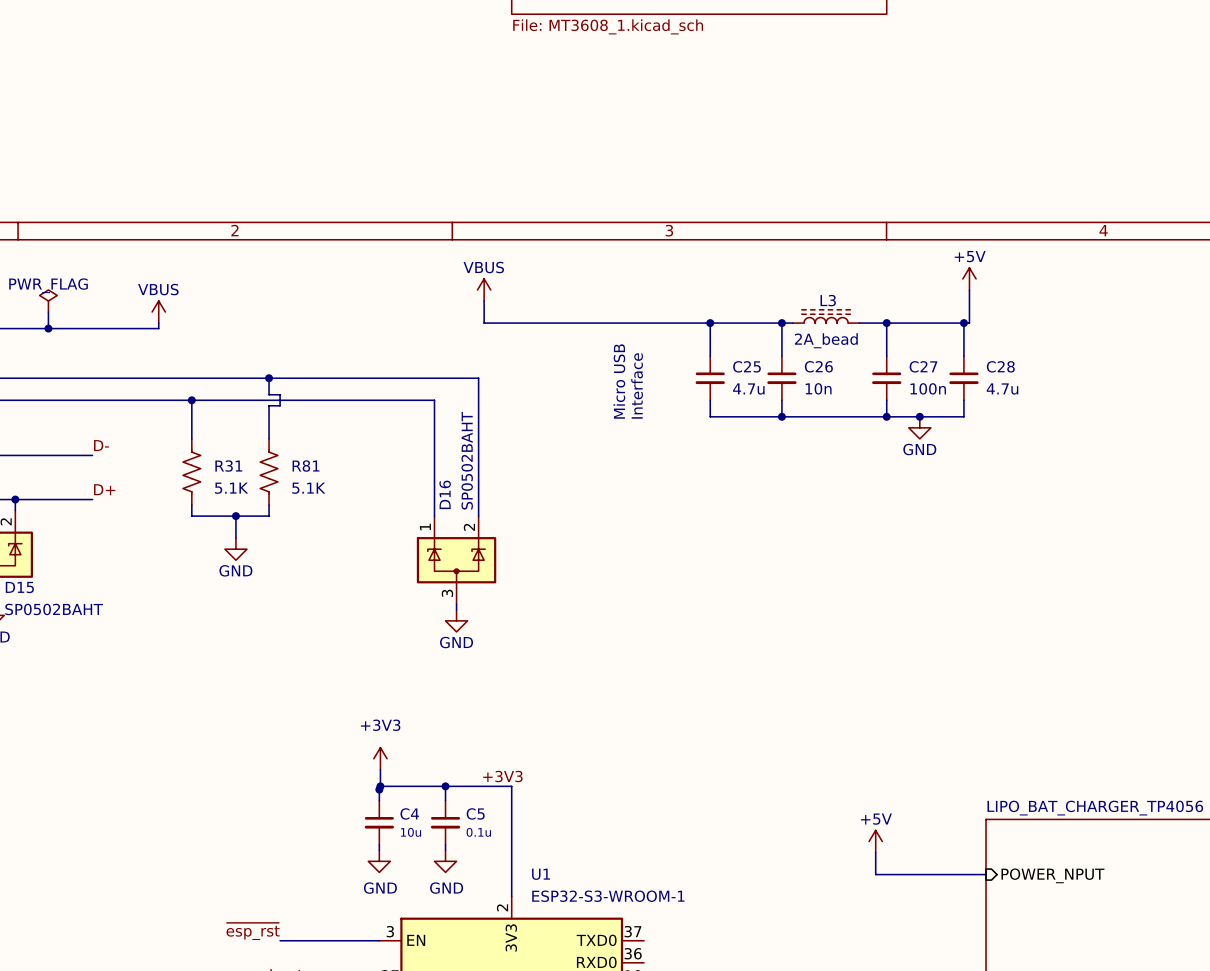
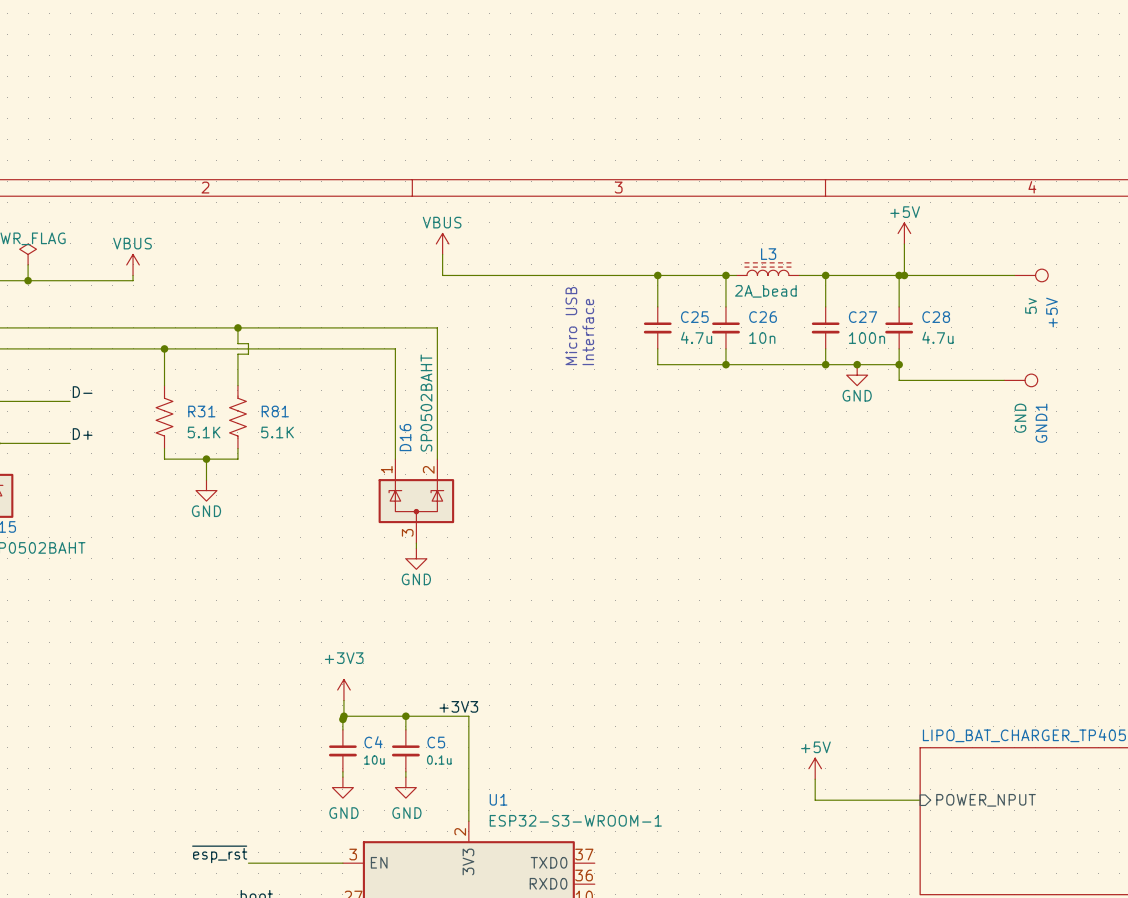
wire: none -> (904, 275) (1014, 275)
junction: none -> (904, 275)
+5V: none -> 5v (1031, 275)
wire: none -> (899, 364) (899, 380) (1004, 380)
junction: none -> (899, 364)
GND1: none -> GND (1020, 380)

